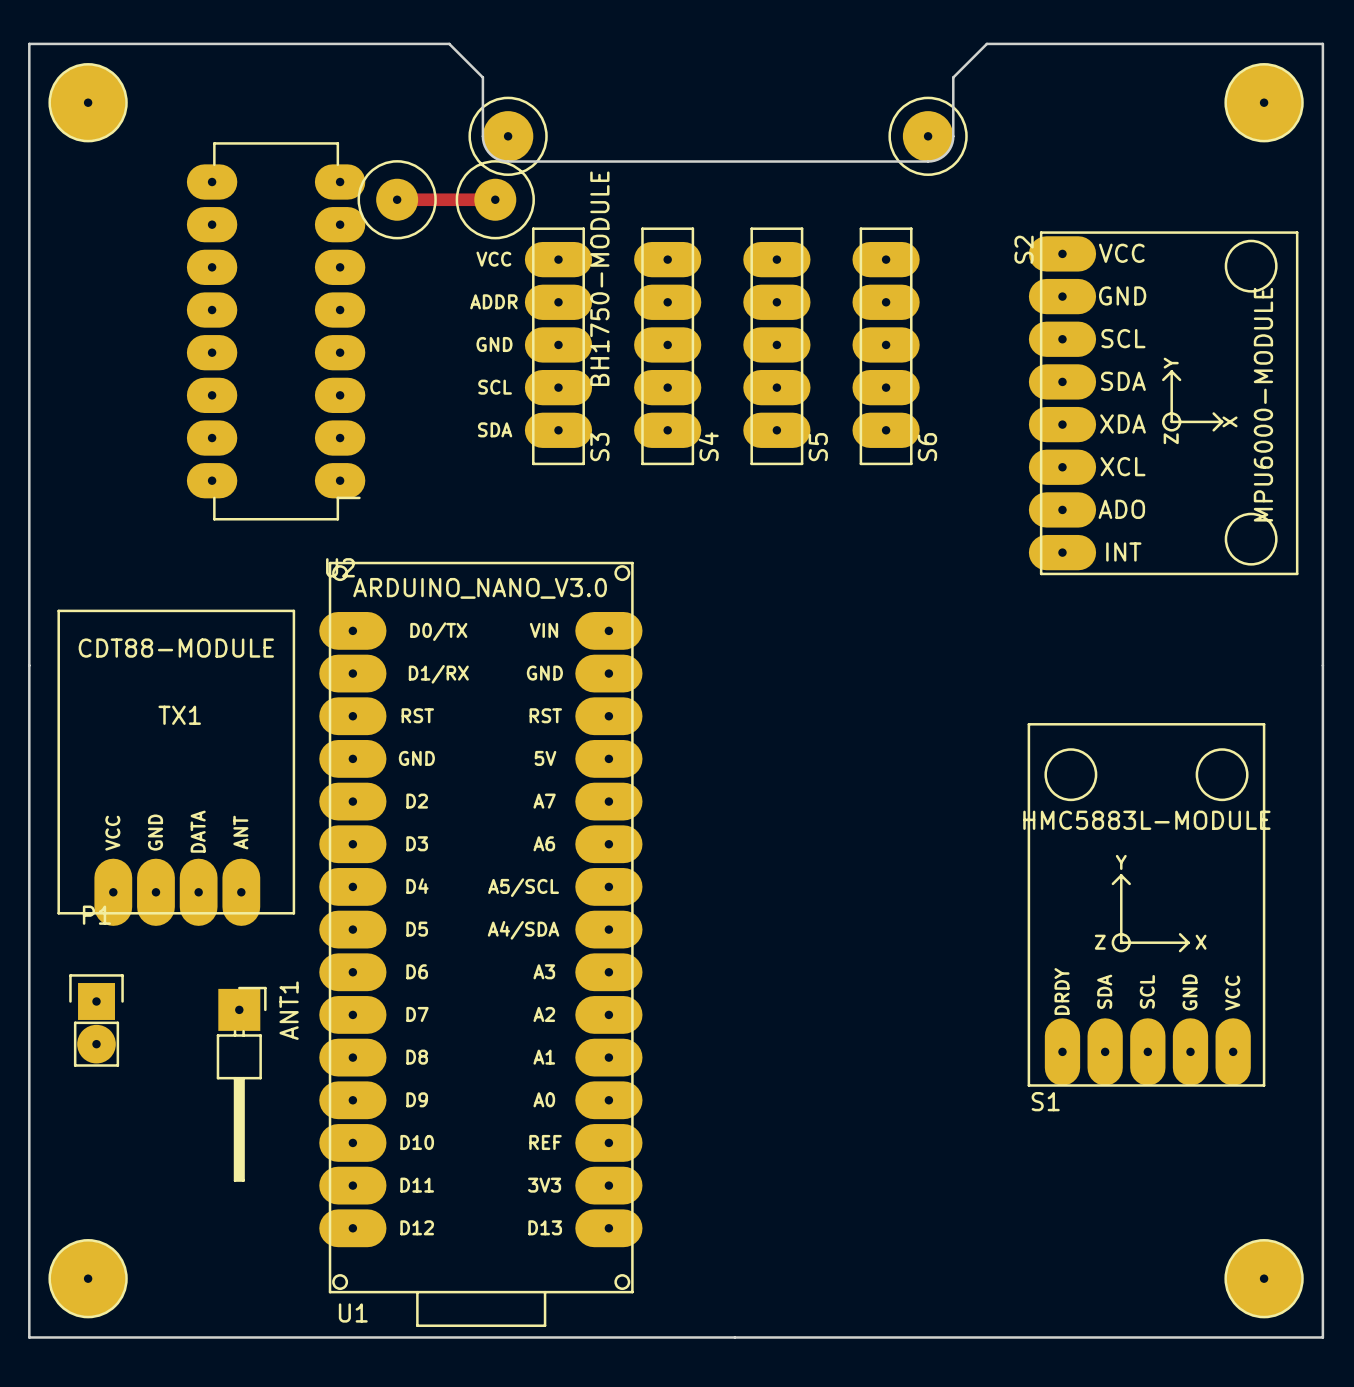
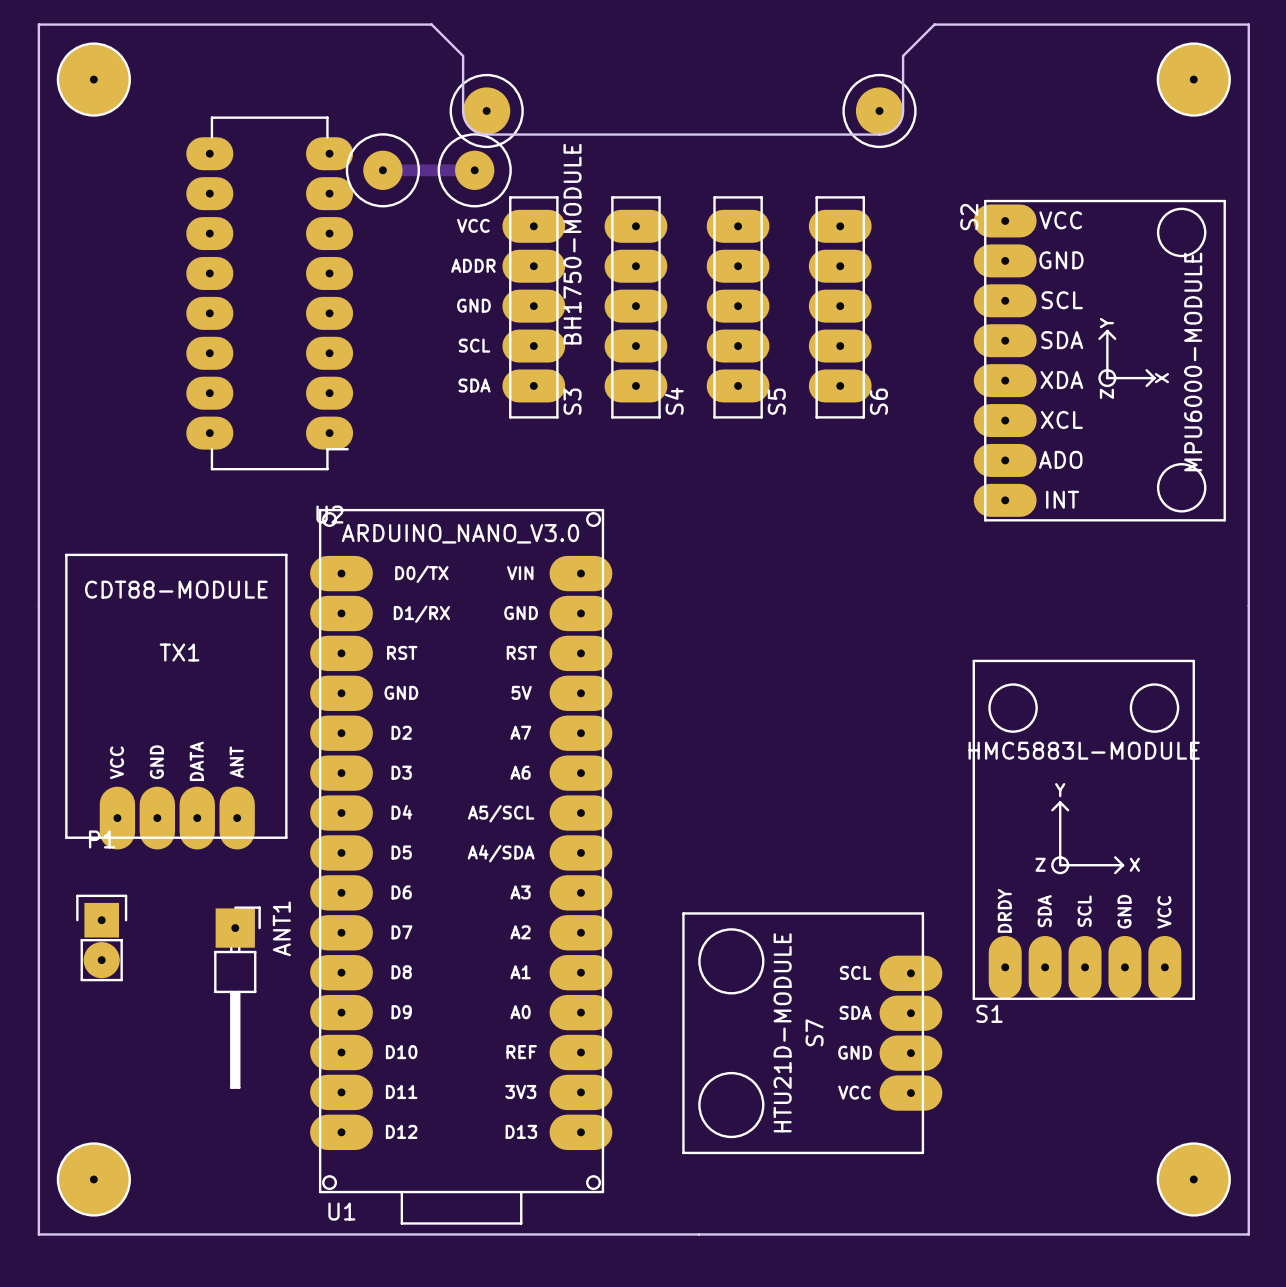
S7: none -> HTU21D-MODULE (812, 1033)

